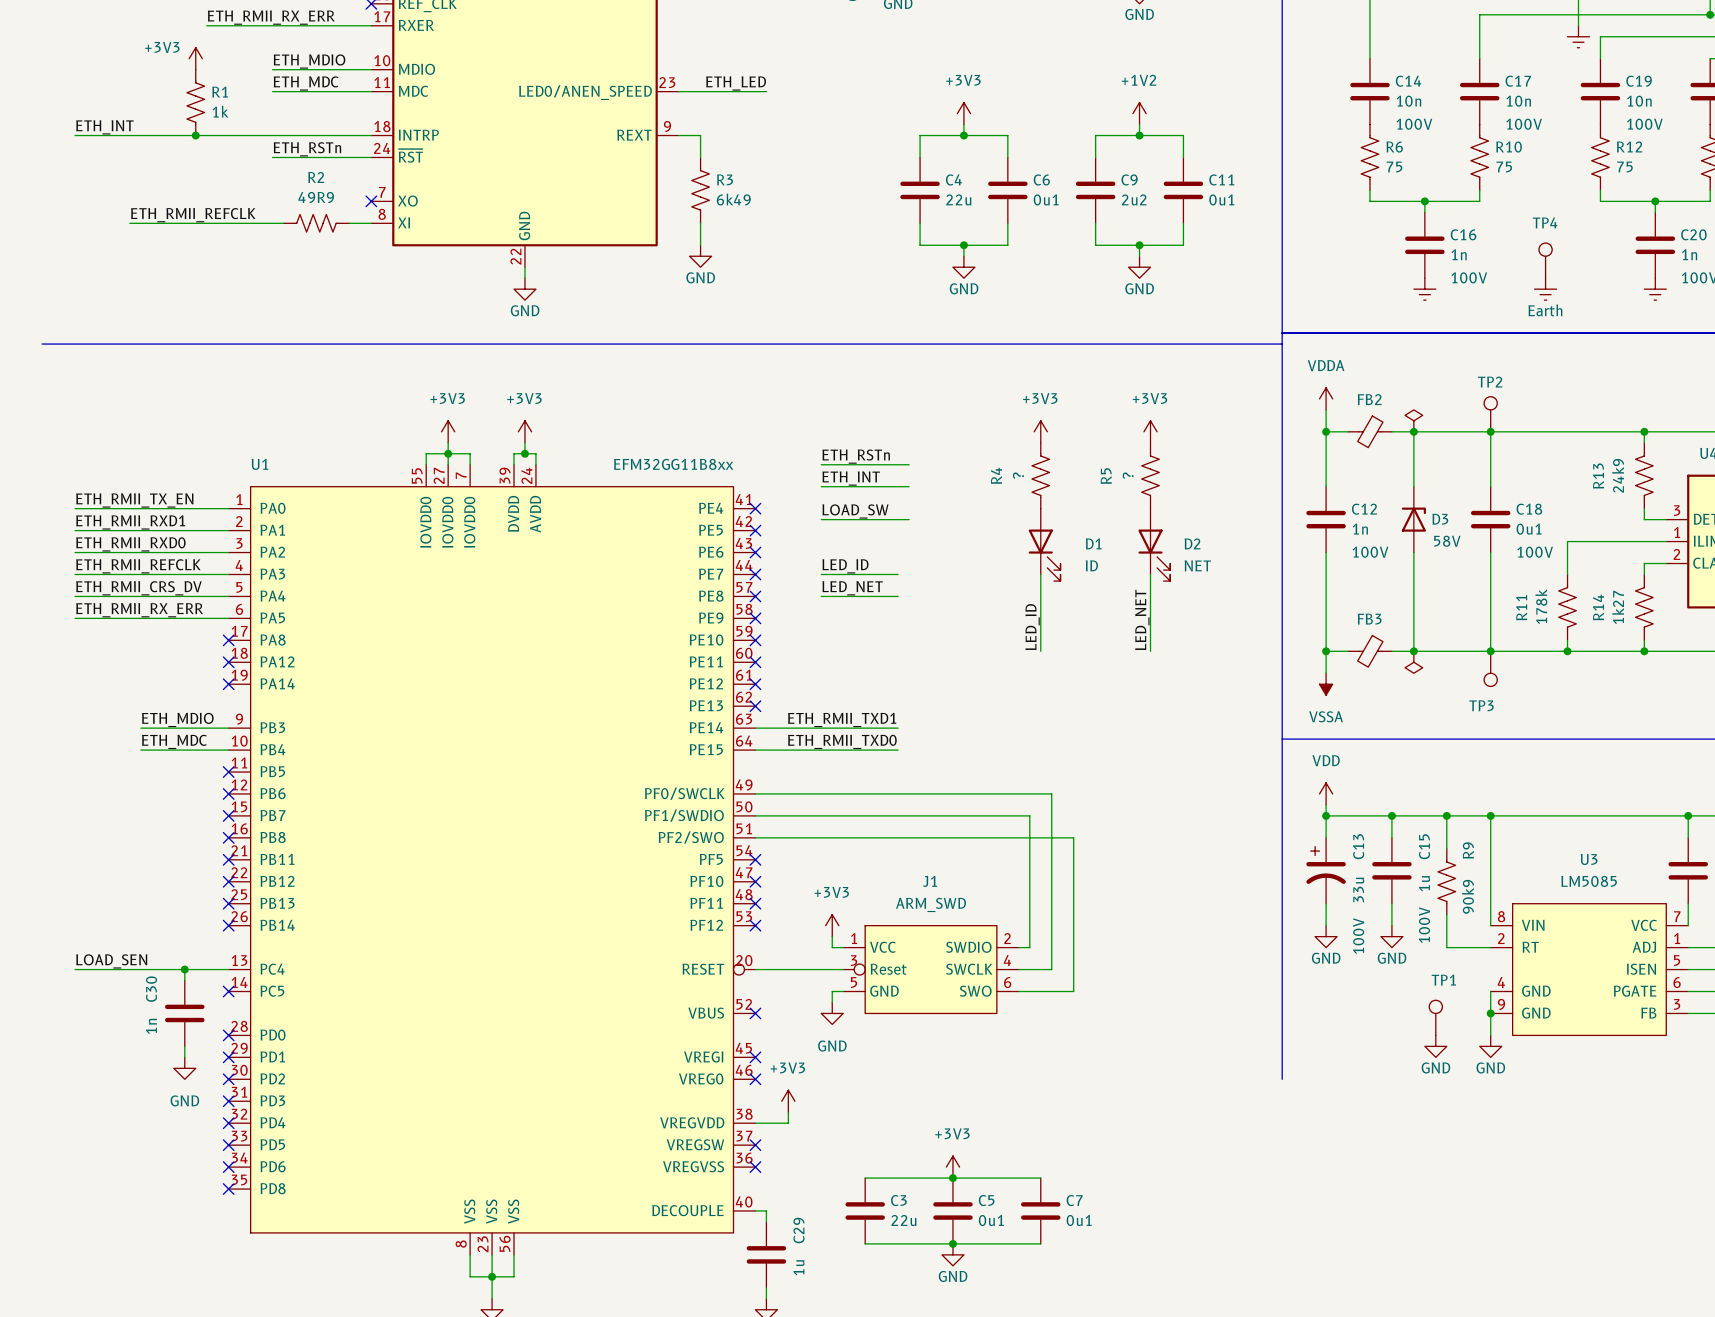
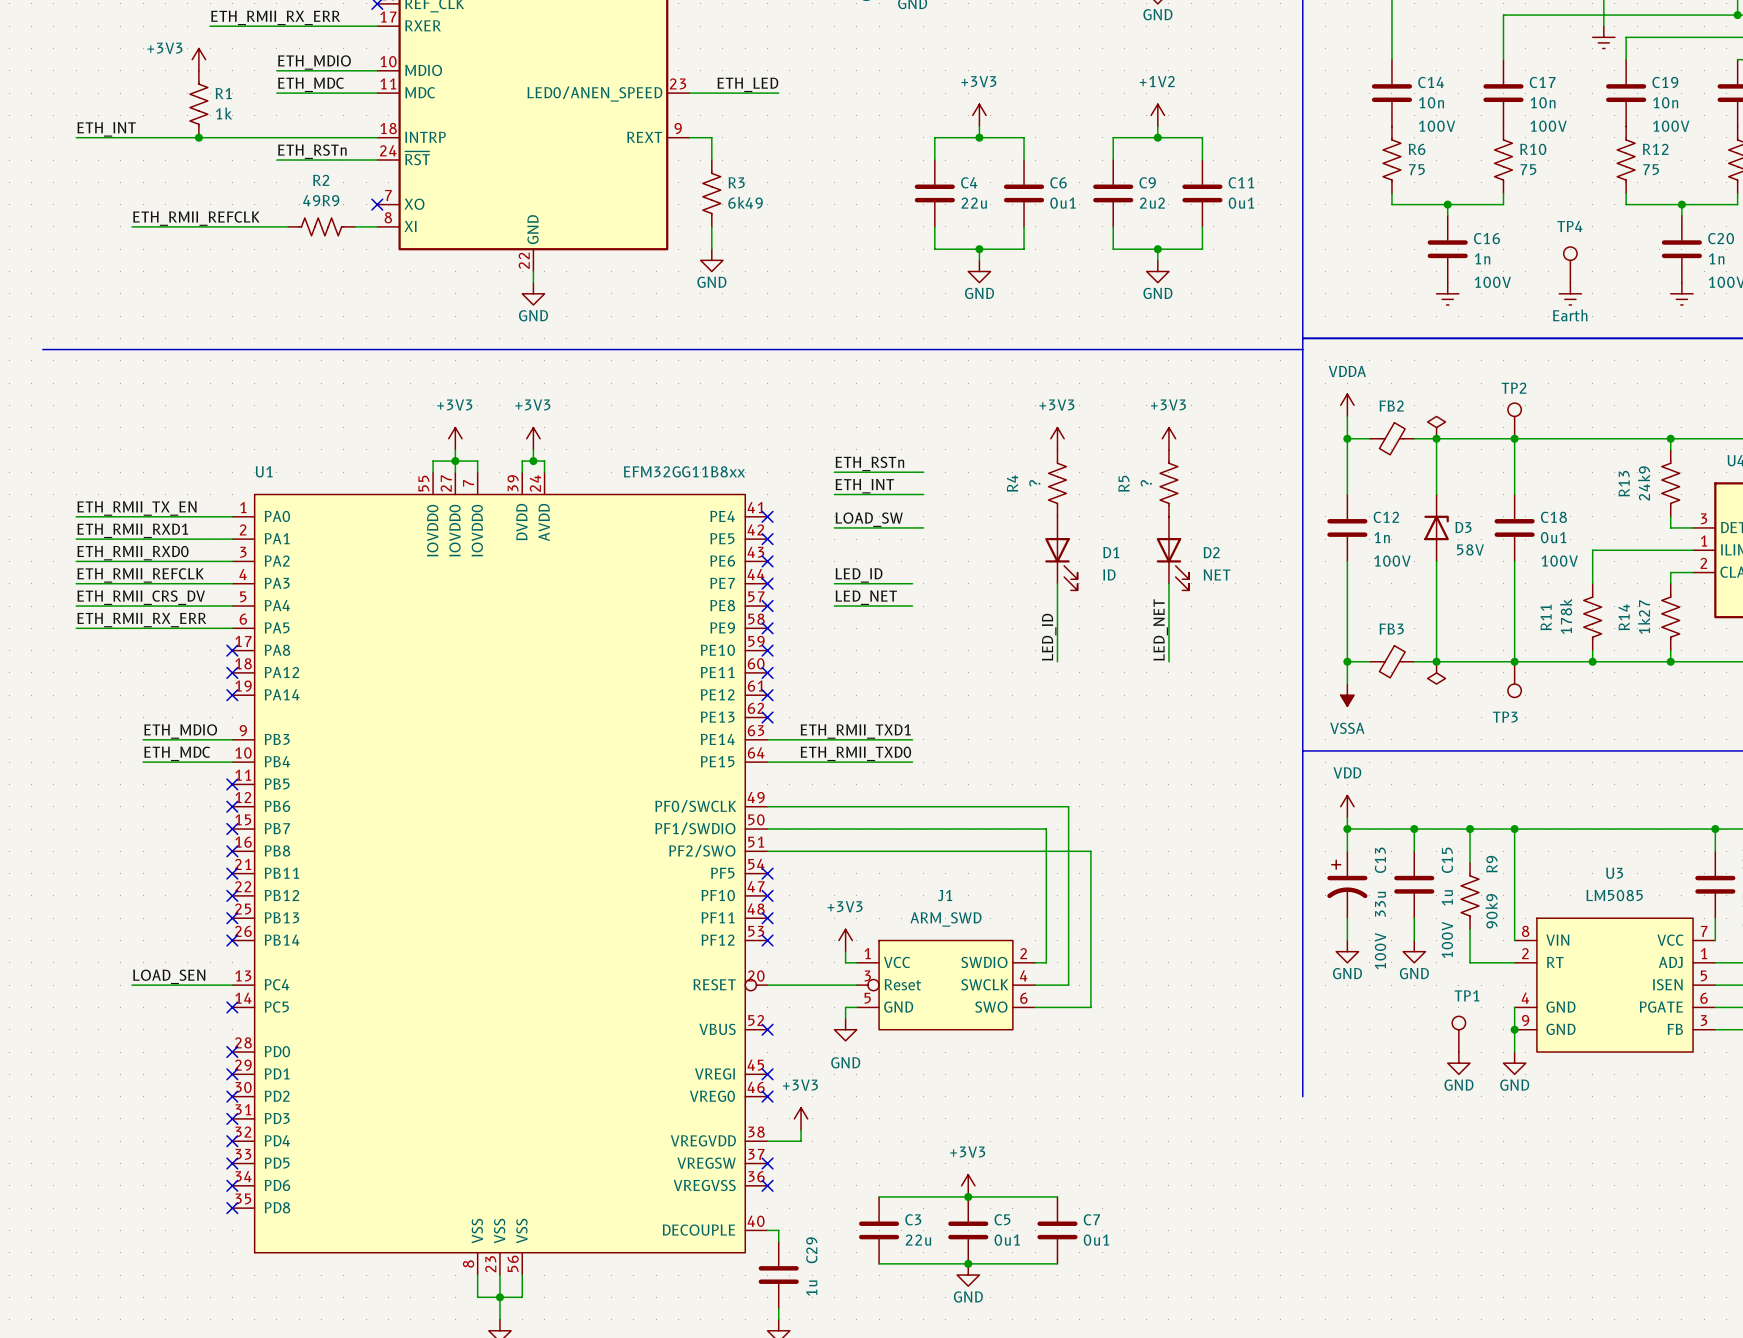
label position: LOAD_SEN (111, 961) -> LOAD_SEN (169, 976)
wire: (75, 969) (129, 969) -> none
wire: (184, 969) (184, 980) -> none
junction: (184, 969) -> none
C30: 1n (184, 1013) -> none
wire: (184, 1046) (184, 1057) -> none
power symbol: GND (184, 1068) -> none

